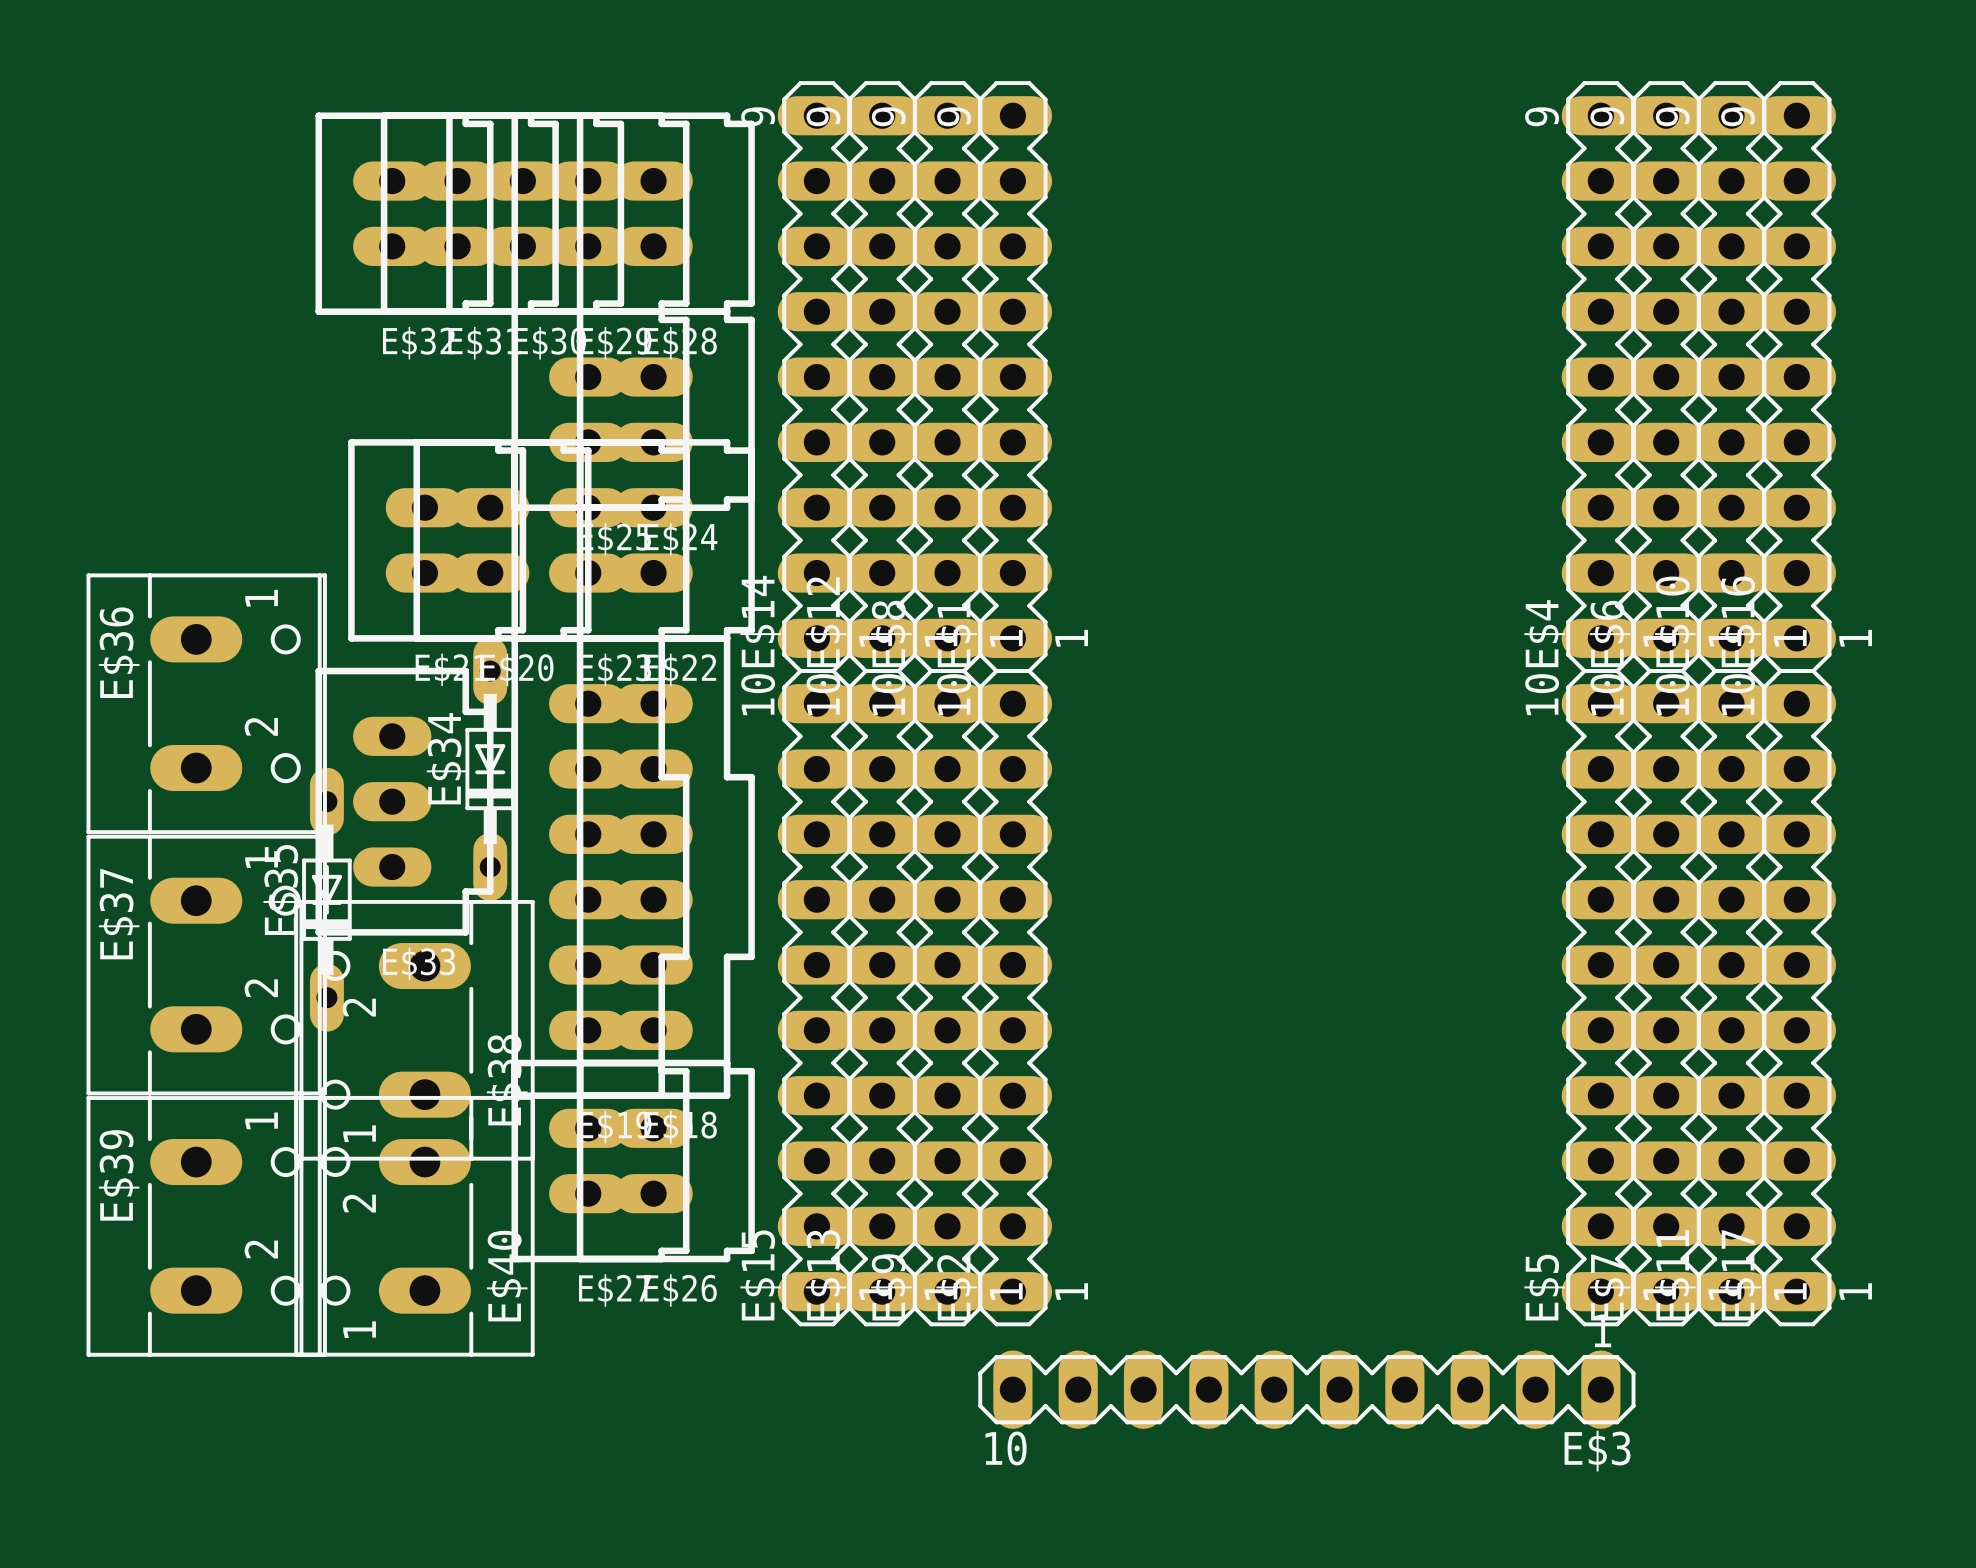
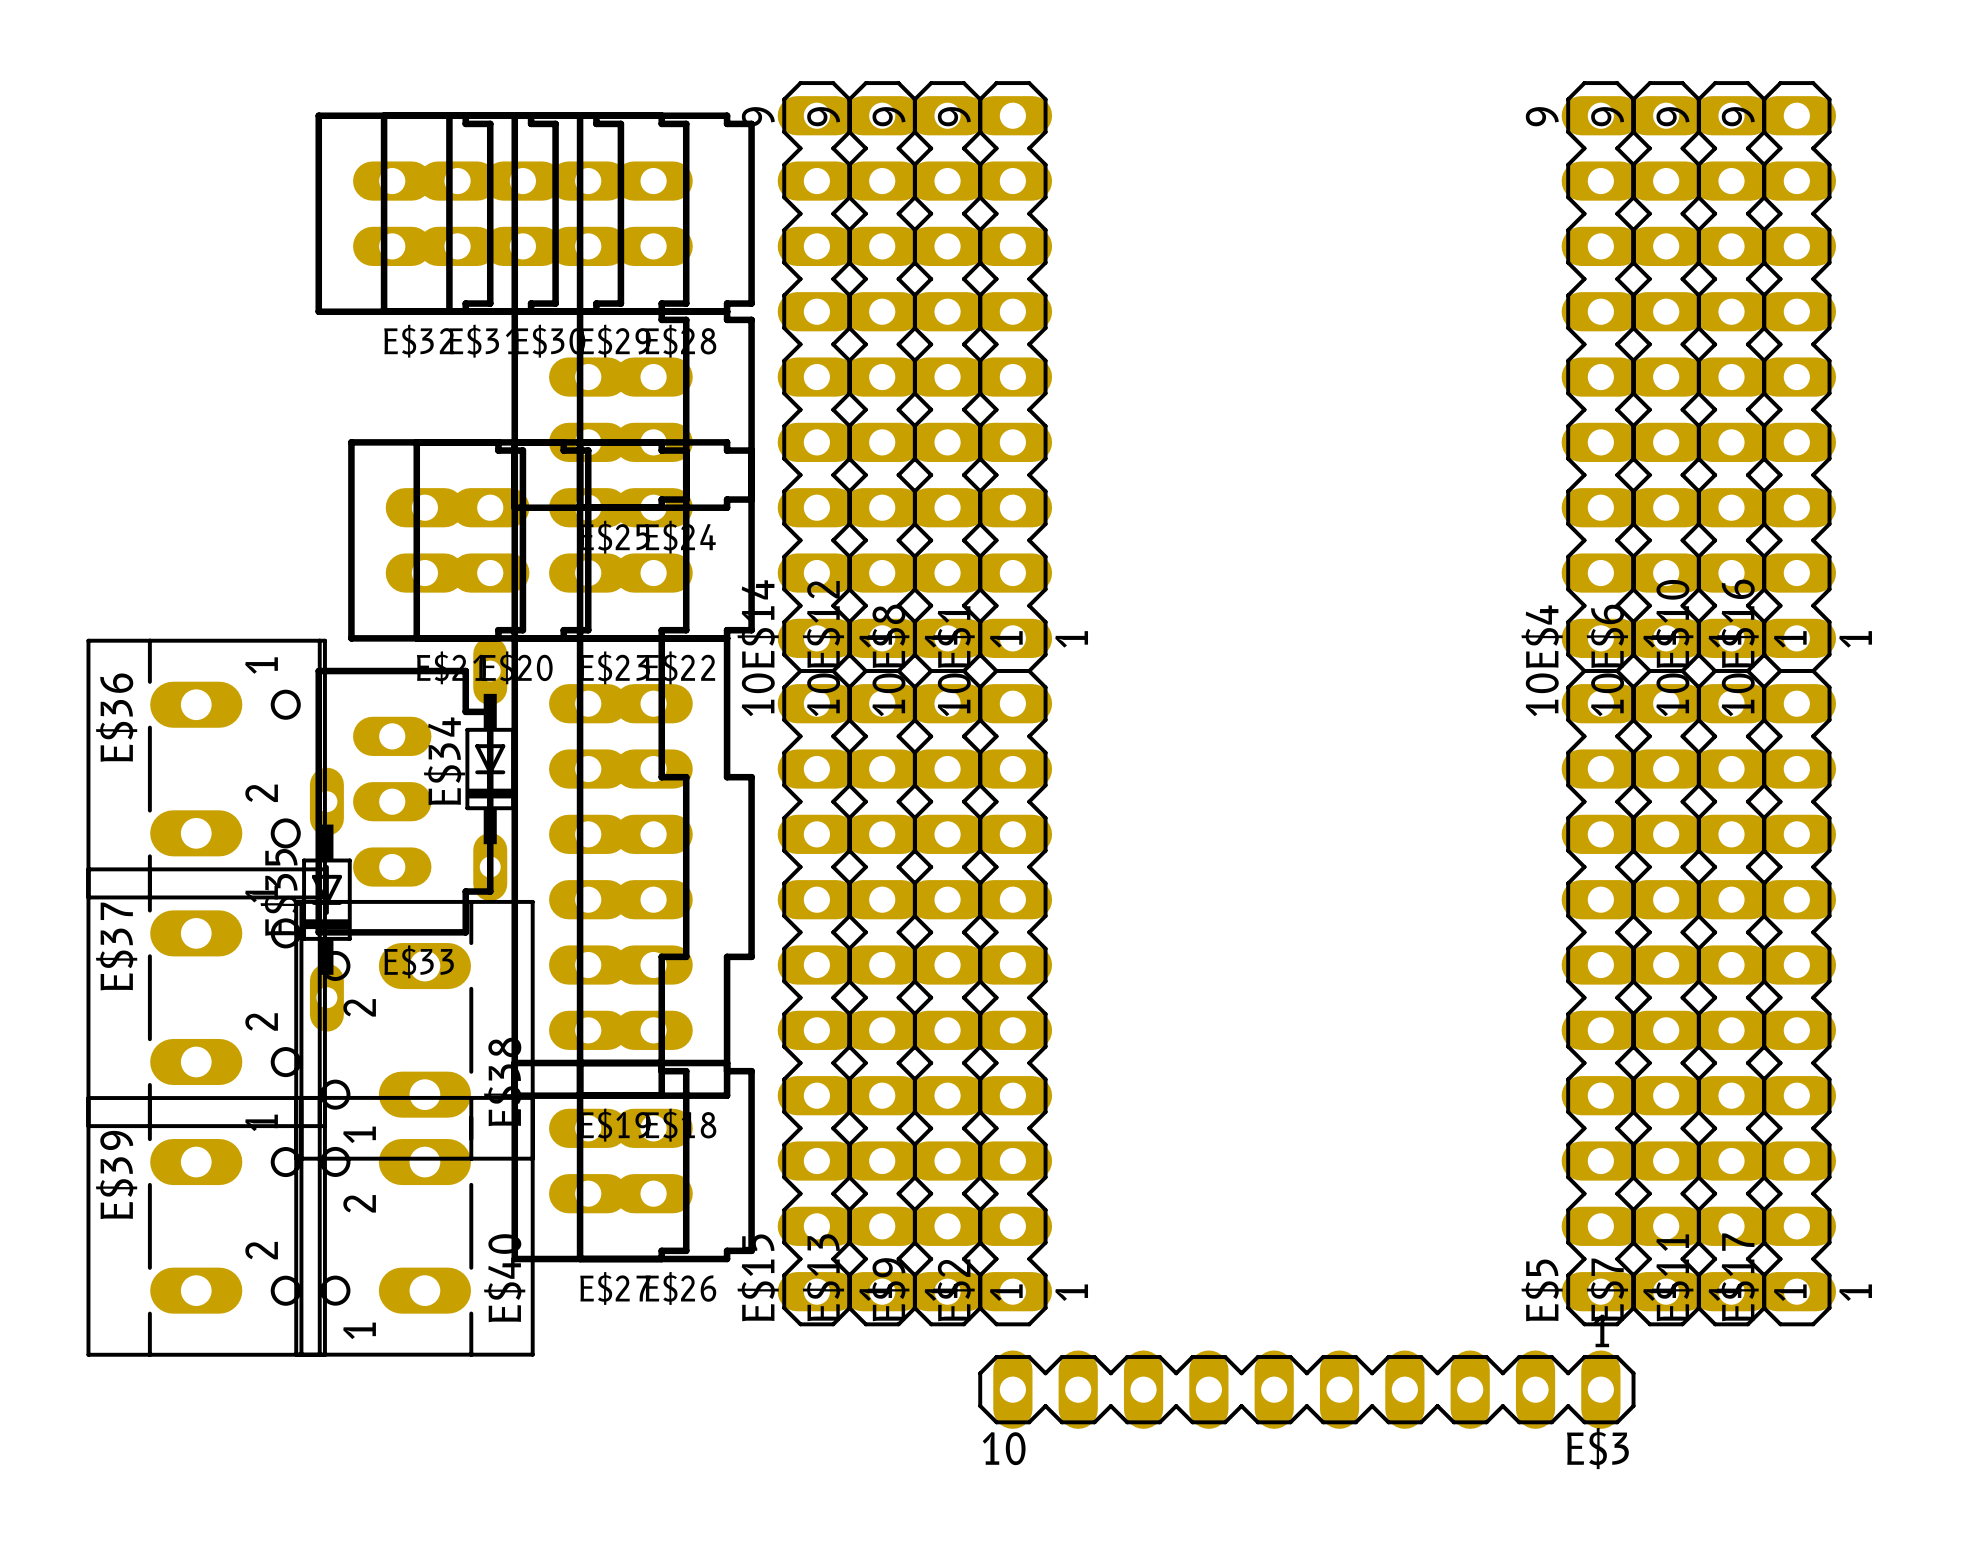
E$36 position: (206, 703) -> (206, 769)
E$37 position: (206, 965) -> (206, 997)

